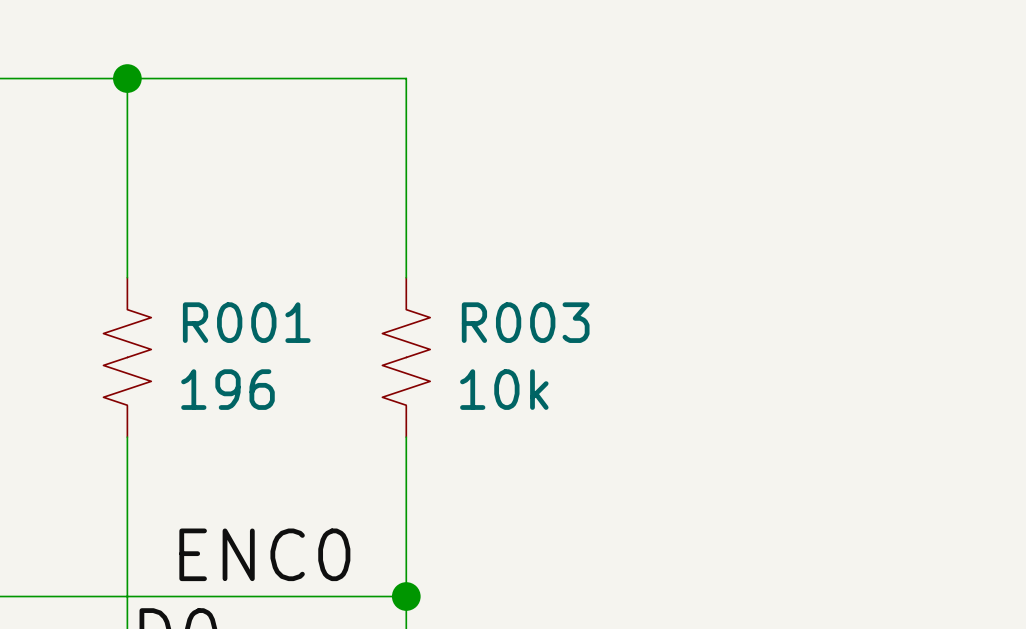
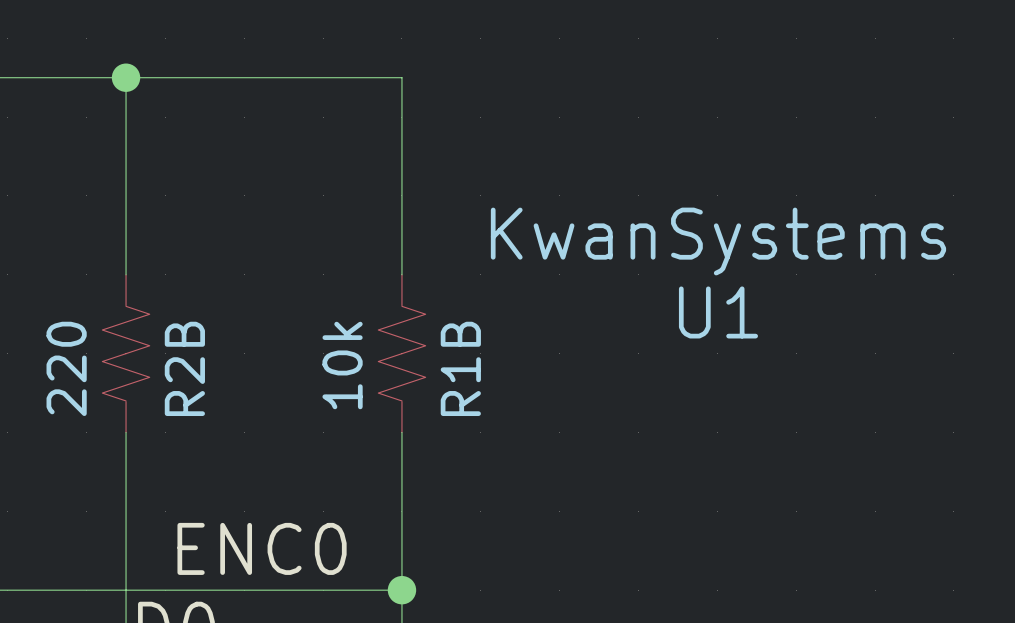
U1: none -> KwanSystems (718, 273)
R001 name: R001 (246, 322) -> R2B (184, 368)
R003 name: R003 (525, 322) -> R1B (460, 368)
R001 value: 196 (227, 389) -> 220 (66, 368)
R003 value rotation: 0° (504, 389) -> 90° counterclockwise (342, 365)
R003 value position: 10k (504, 389) -> 10k (342, 365)

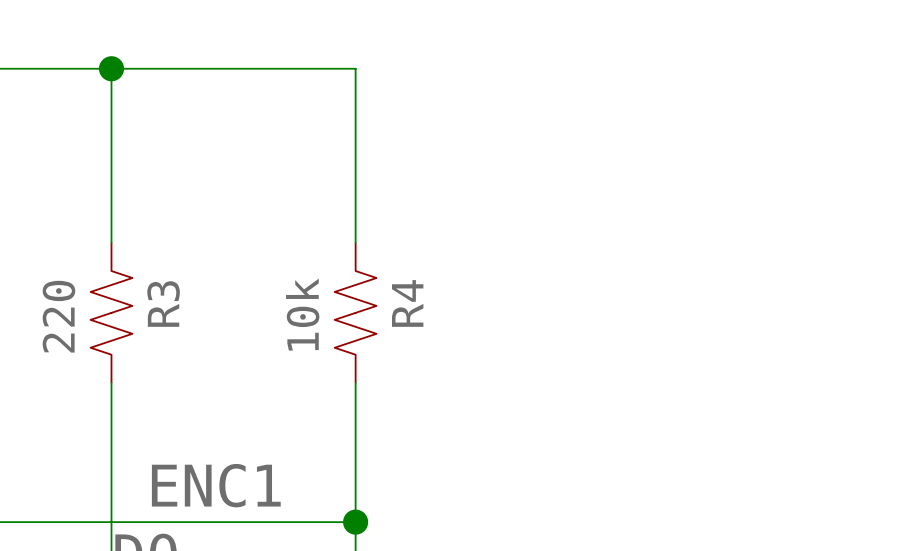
U1: KwanSystems (718, 273) -> none
R2B name: R2B (184, 368) -> R3 (163, 304)
R1B name: R1B (460, 368) -> R4 (407, 303)
label: ENC0 (262, 548) -> ENC1 (216, 485)

